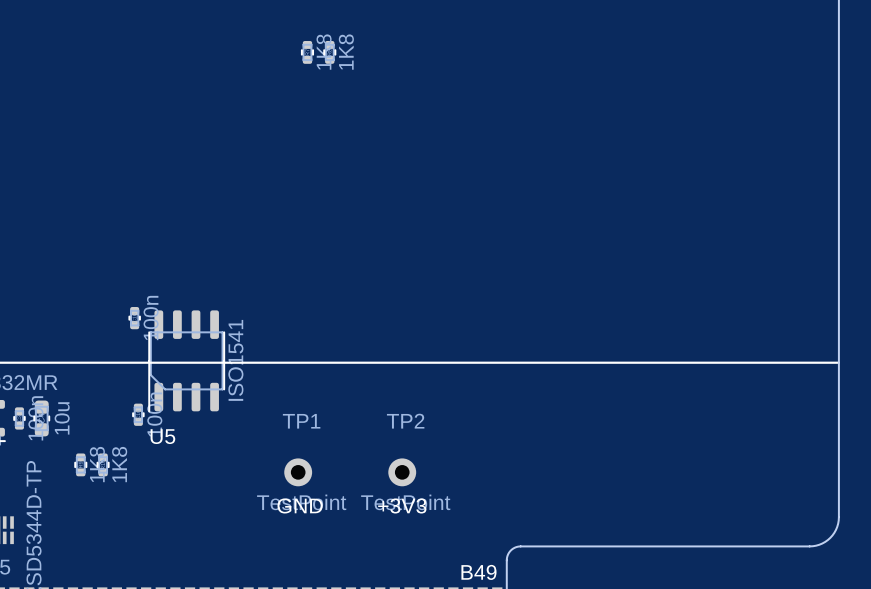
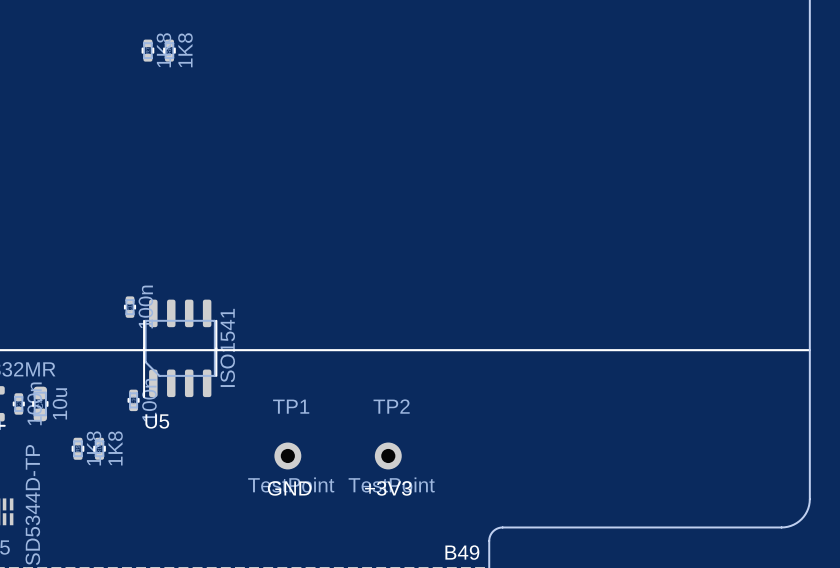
part position: (307, 52) -> (147, 50)
part position: (329, 52) -> (169, 50)

